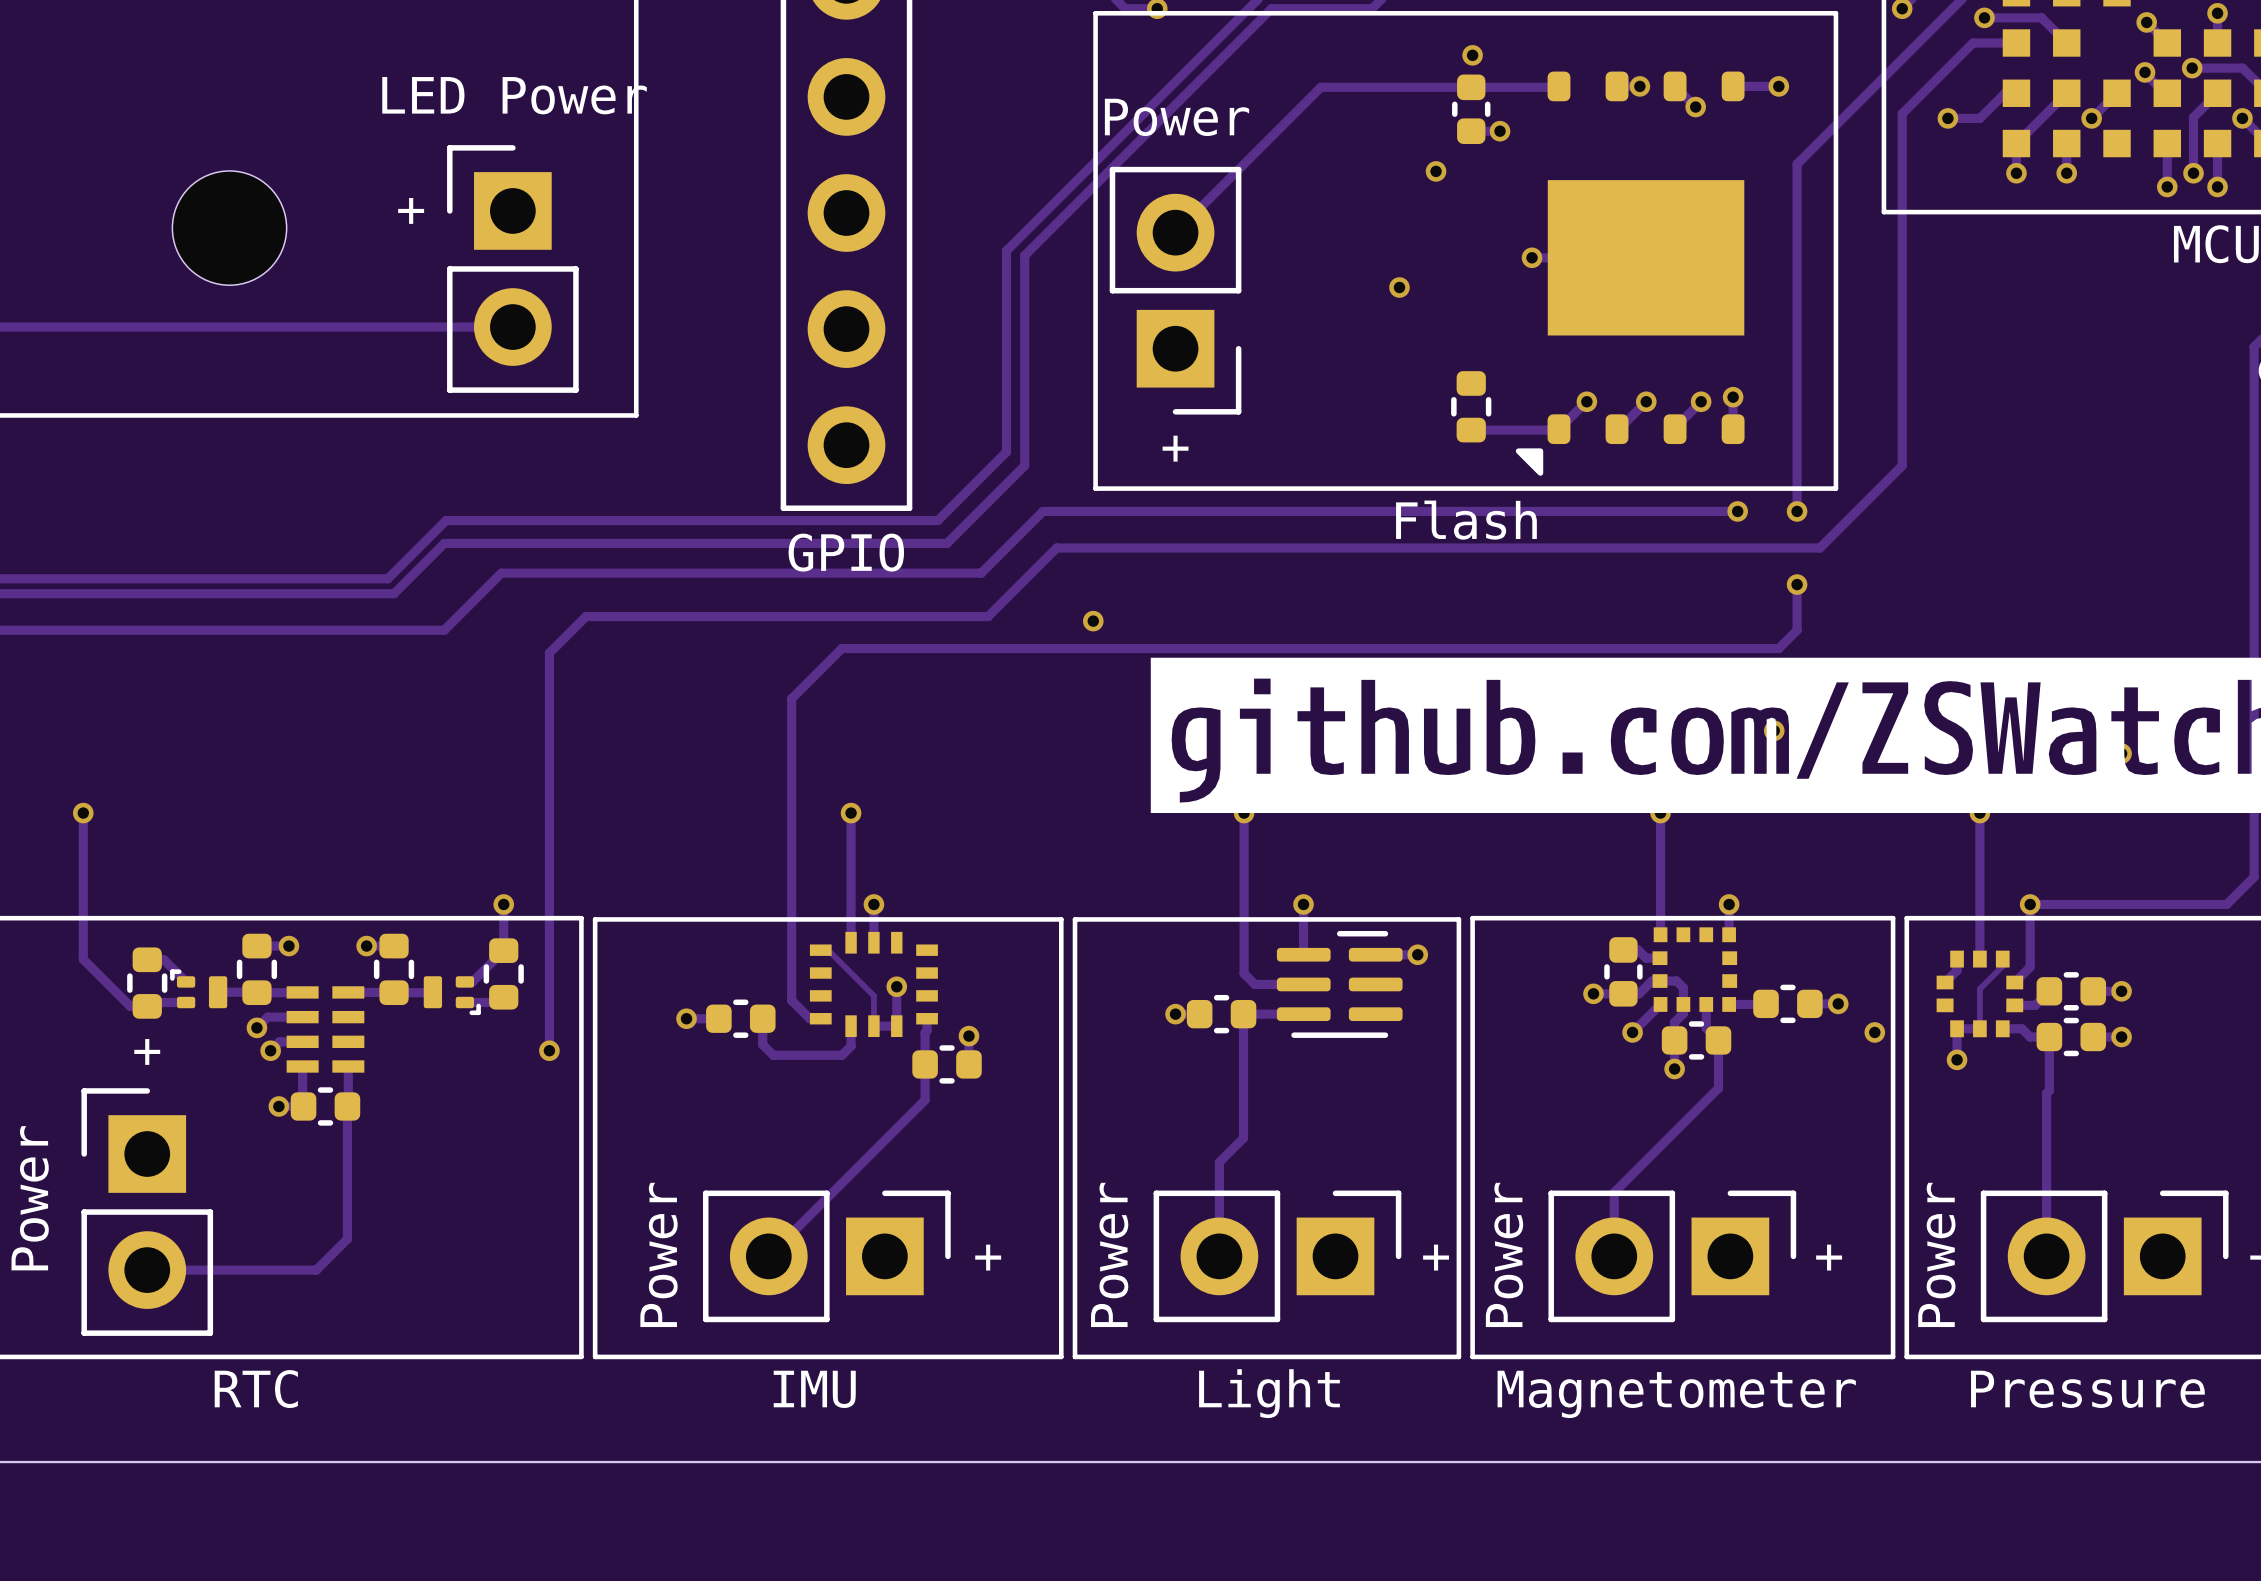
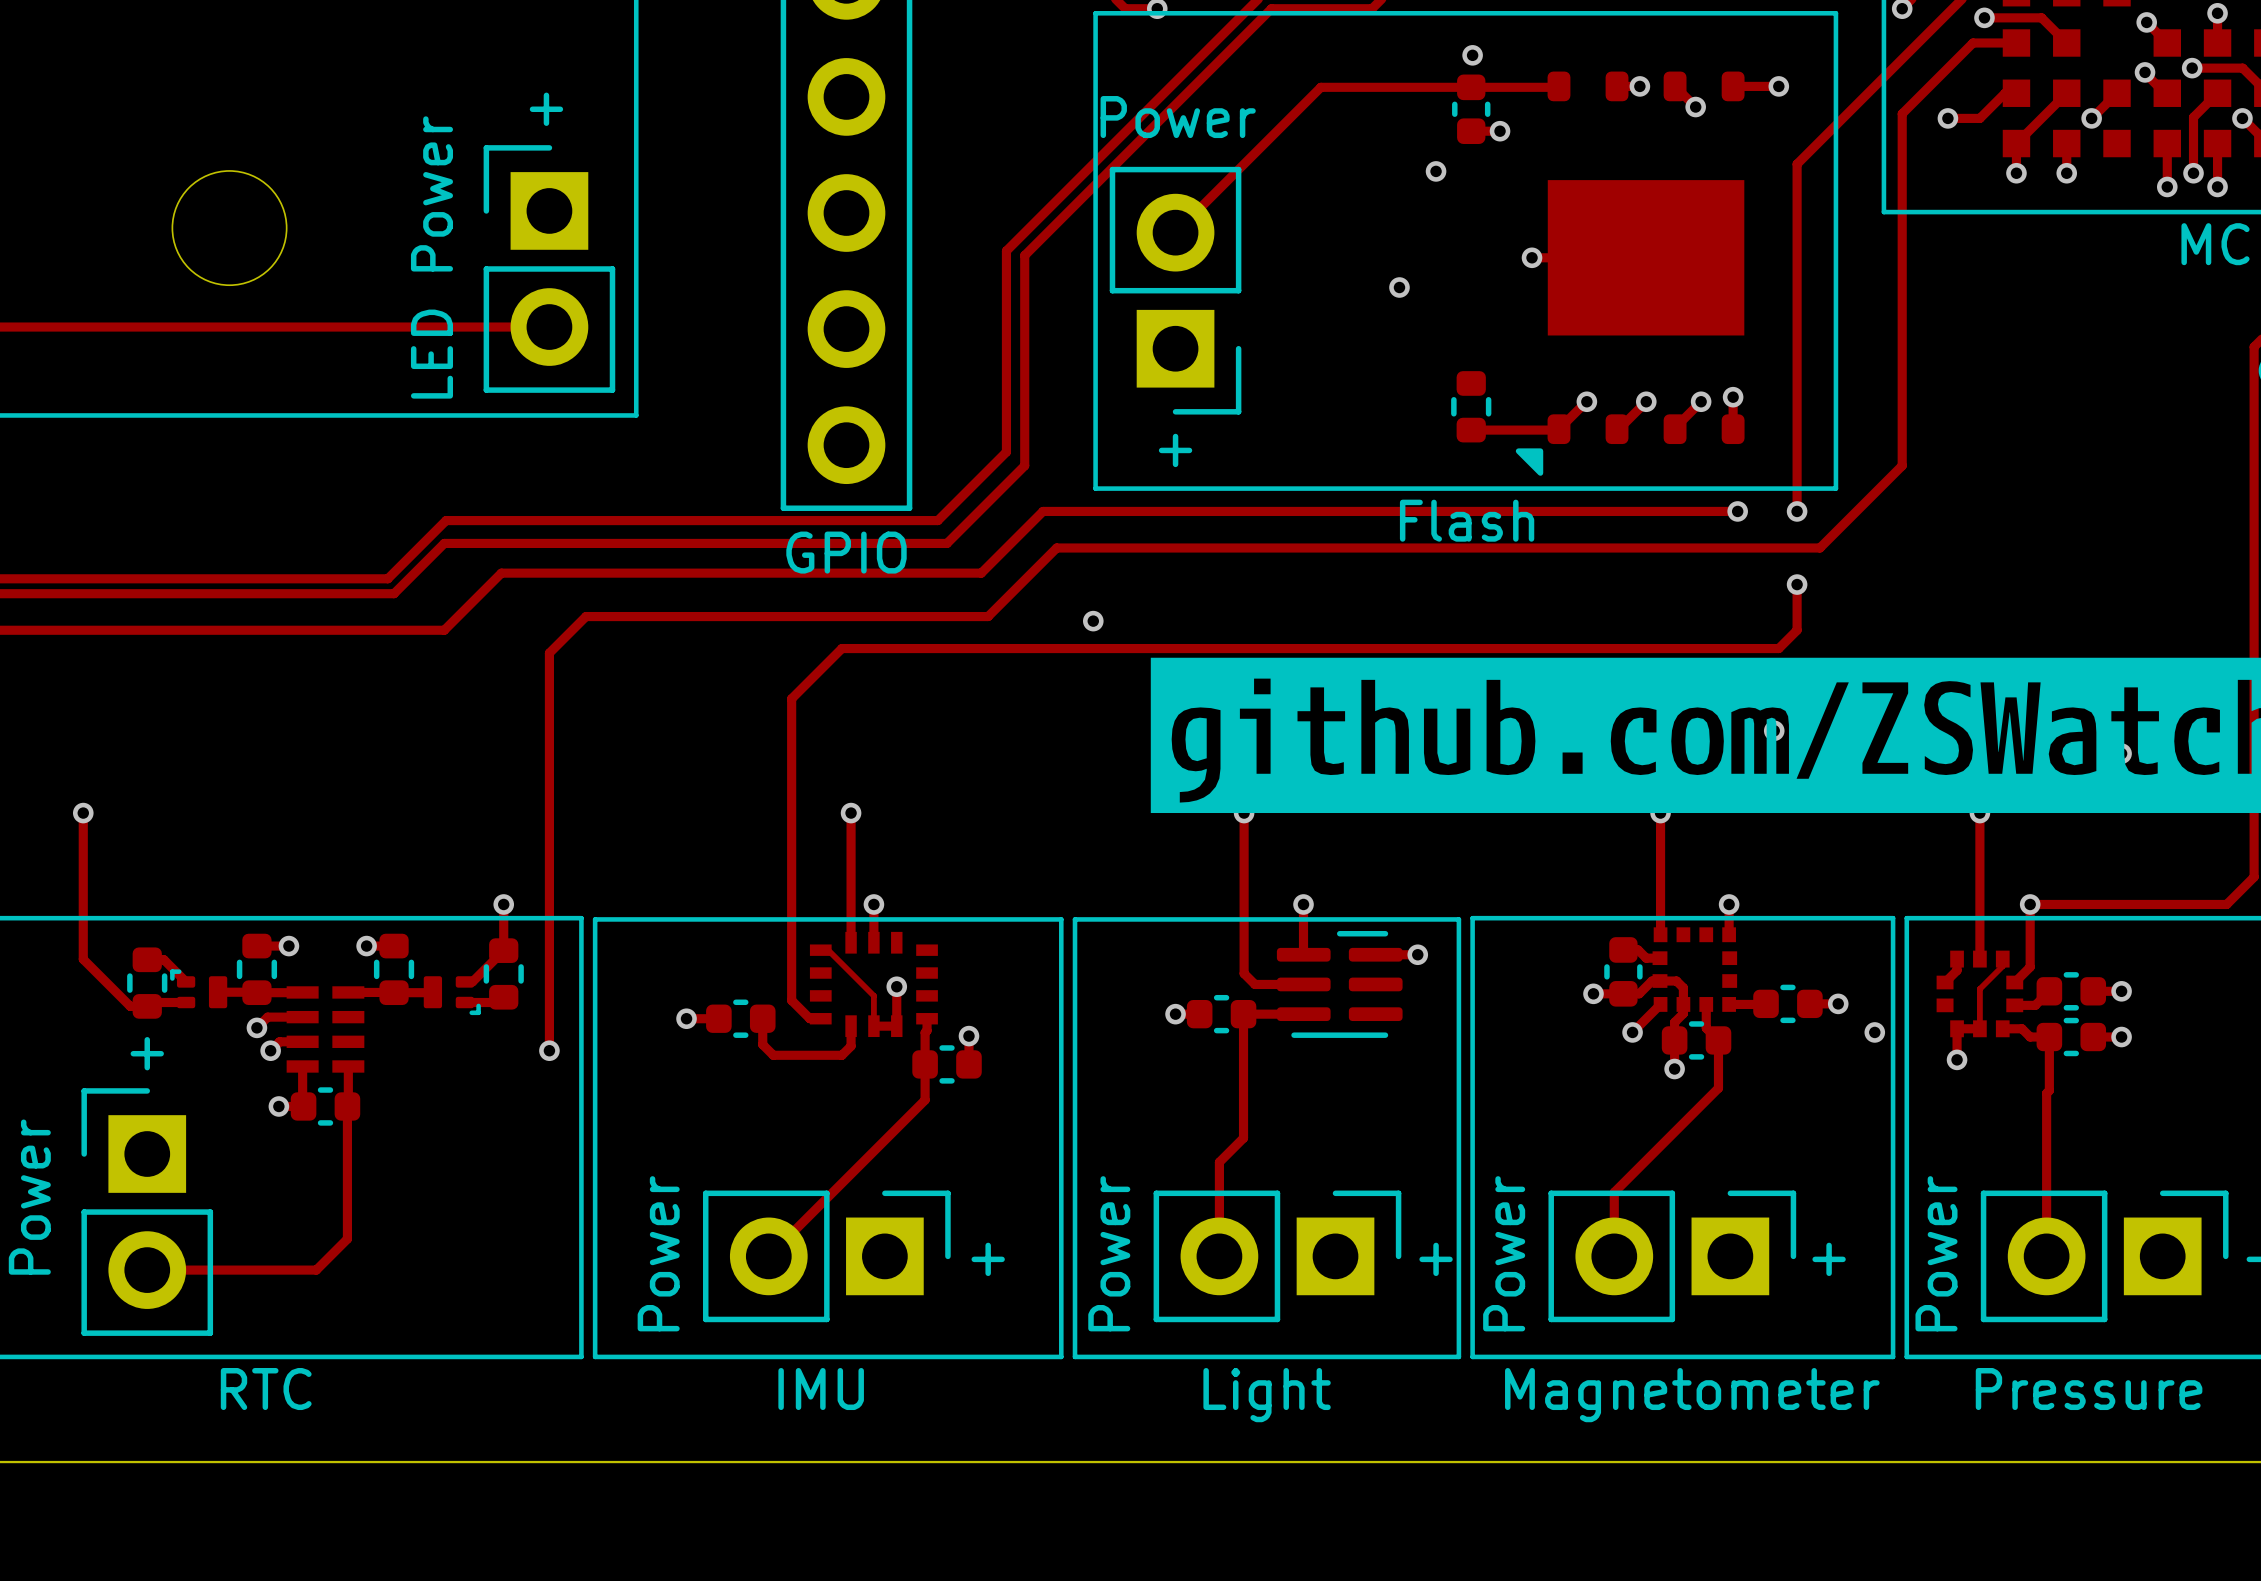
part value rotation: 0° (514, 95) -> 90° counterclockwise (431, 257)
text position: + (411, 210) -> + (546, 109)
part position: (512, 268) -> (549, 268)

